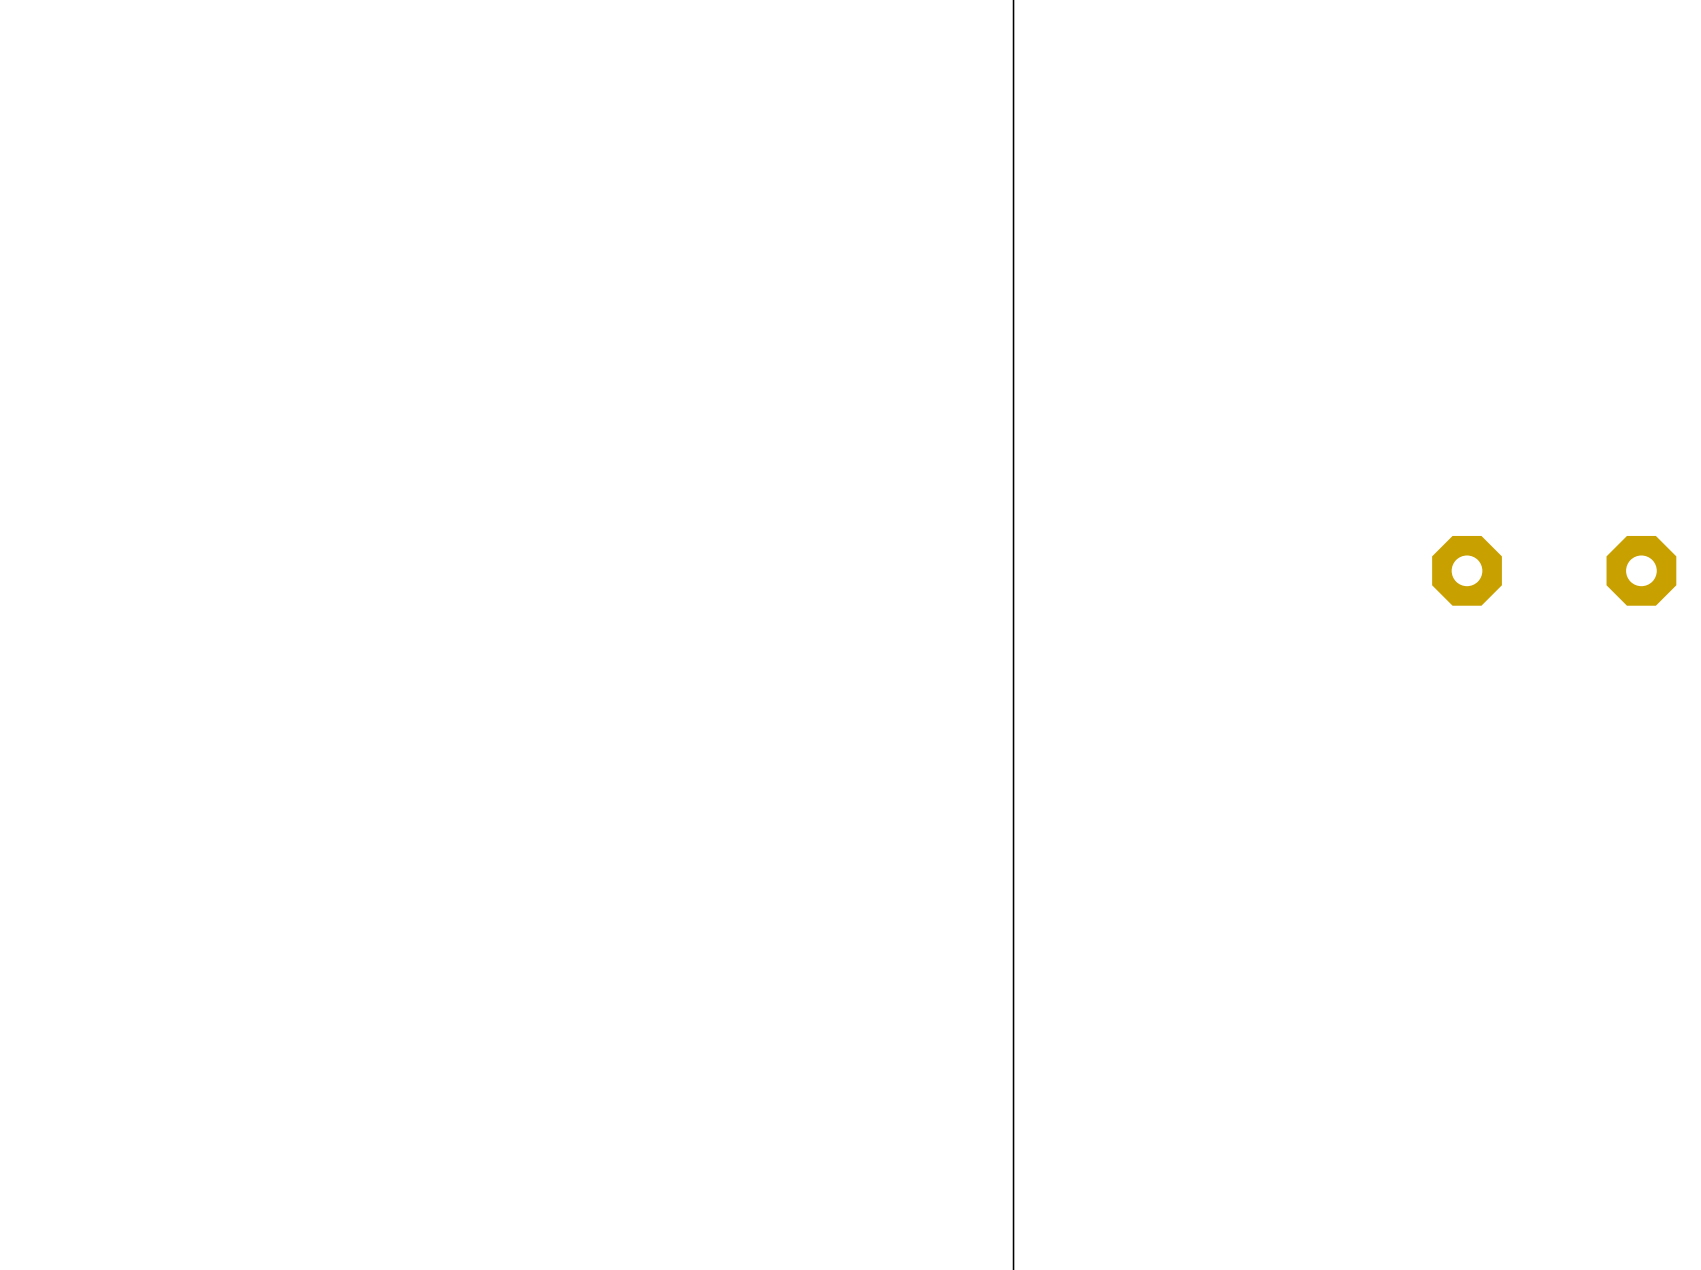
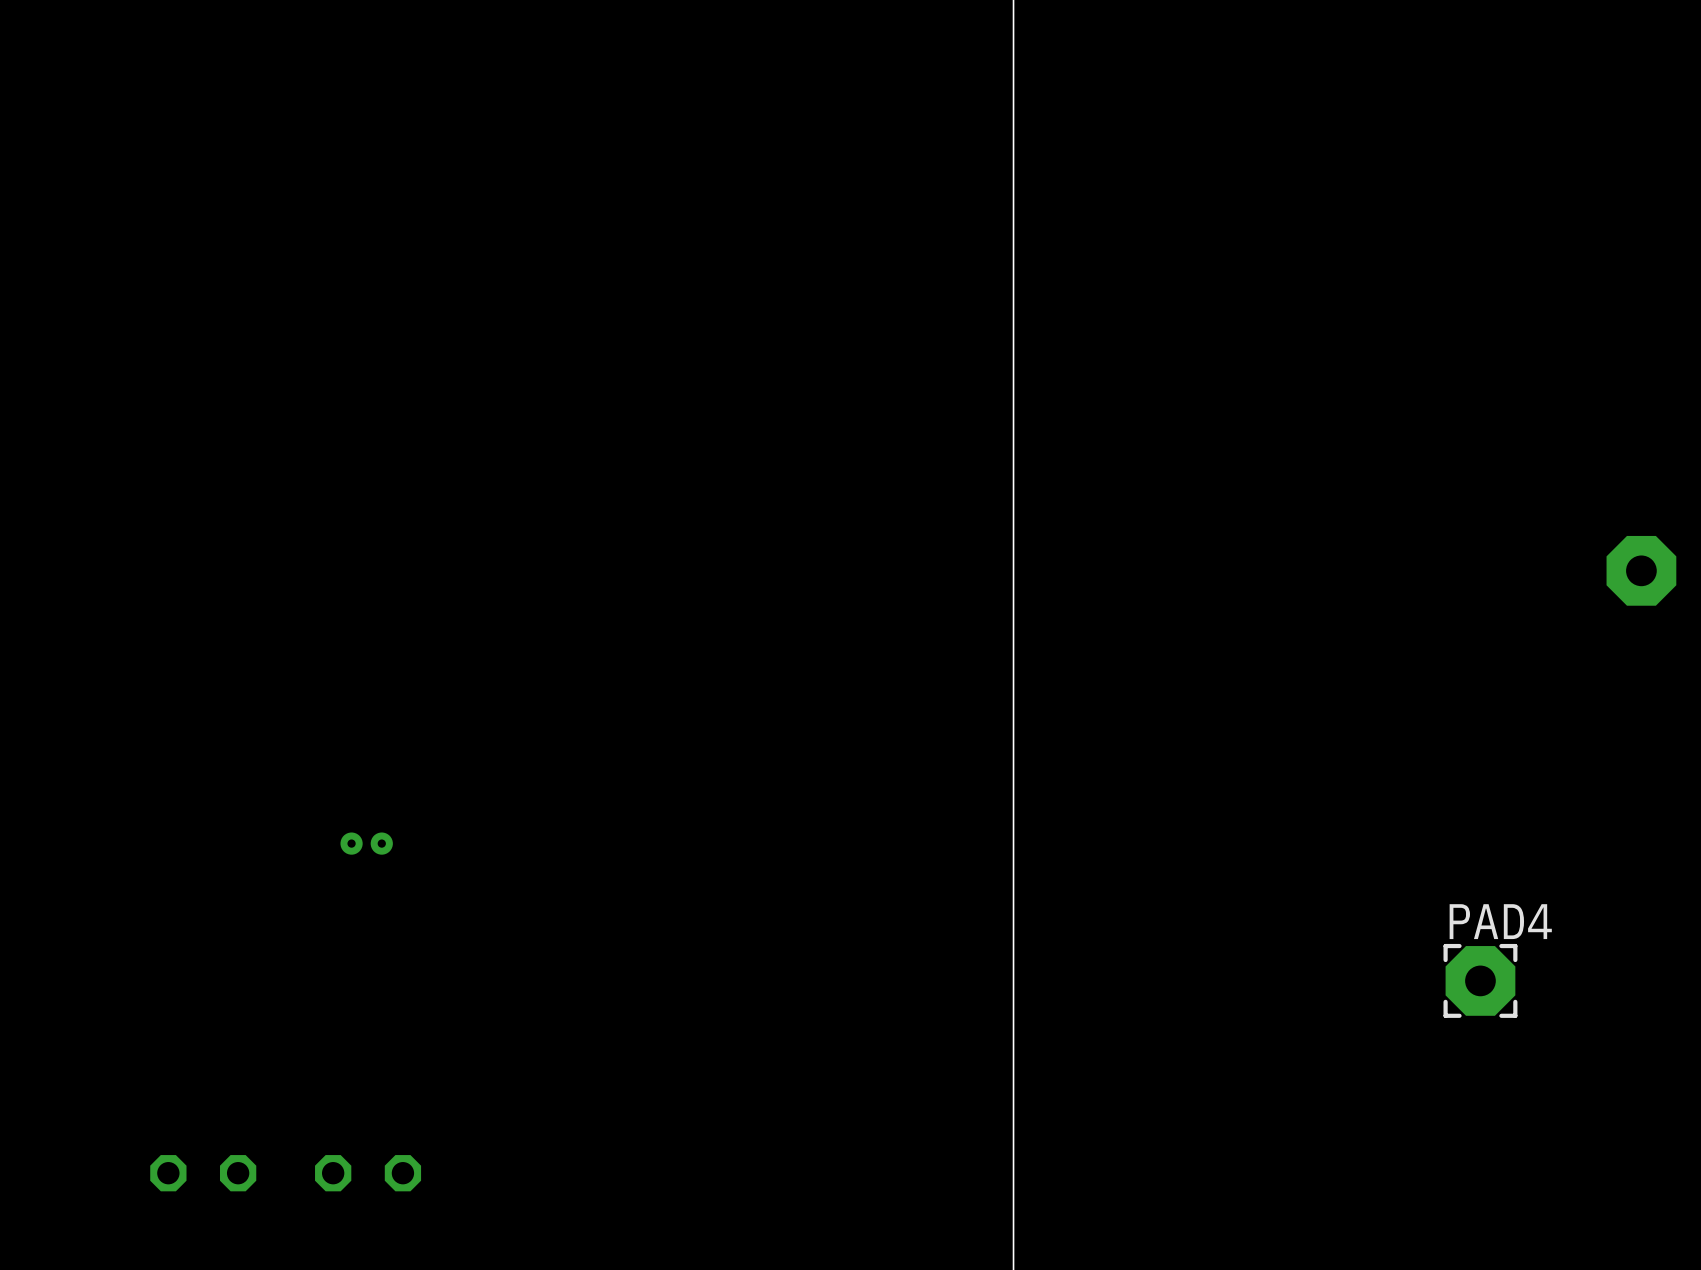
PAD4 side: top (1467, 570) -> bottom (1480, 980)
part: none -> (366, 843)
part: none -> (203, 1173)
part: none -> (368, 1173)

